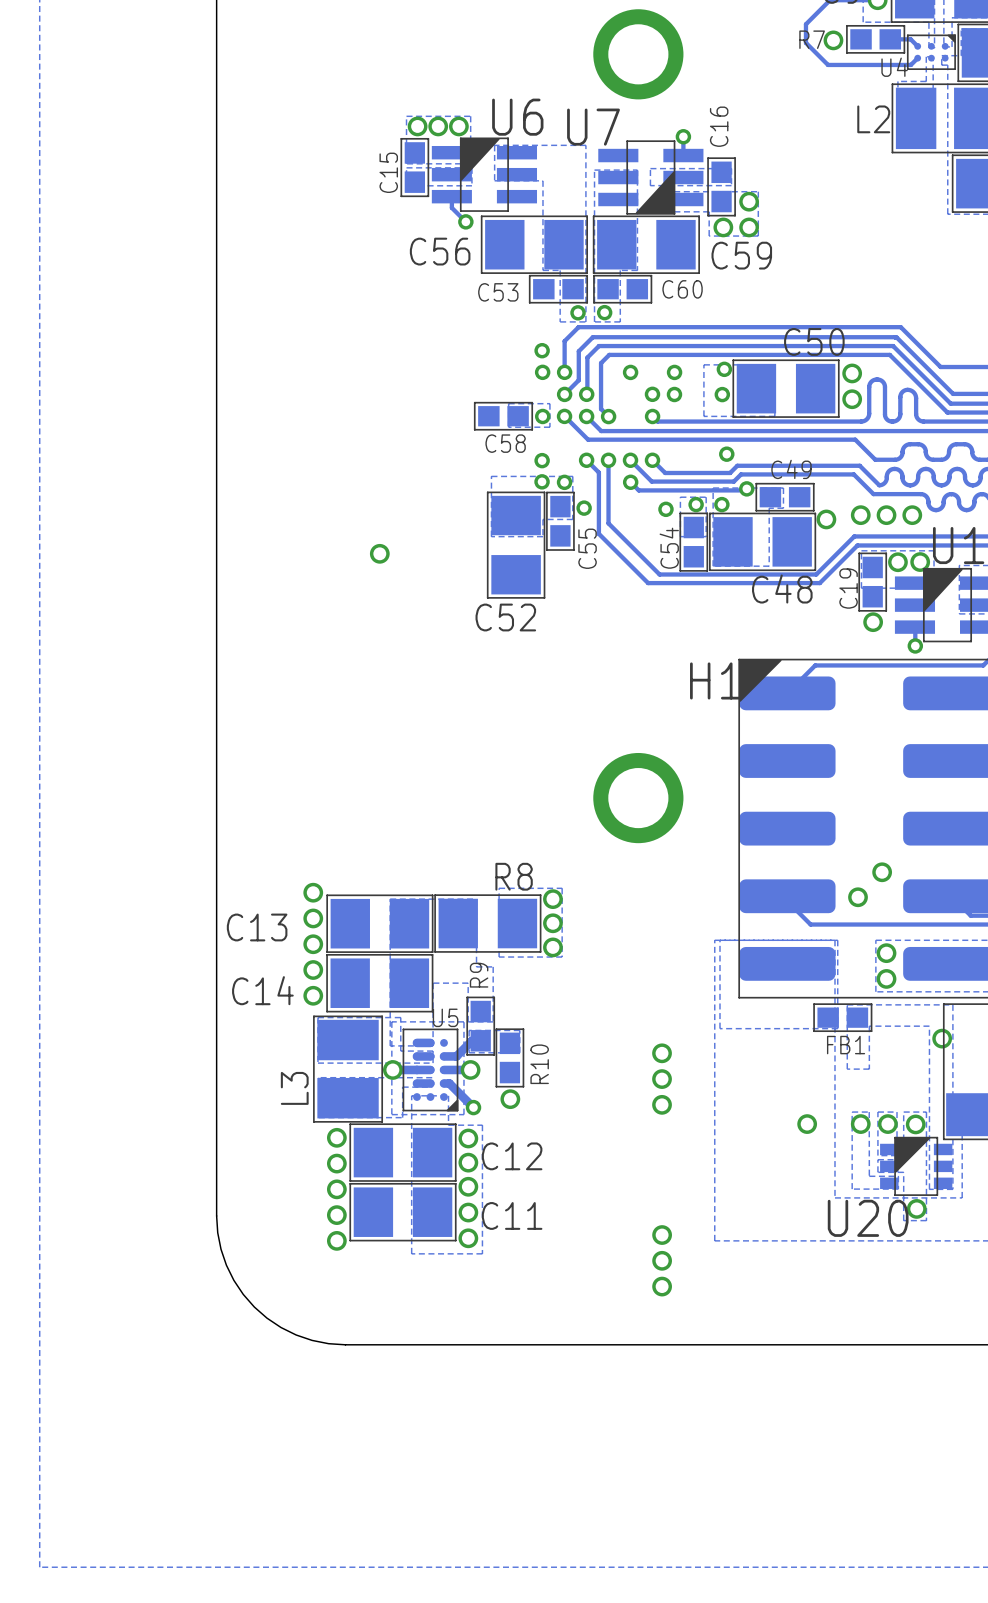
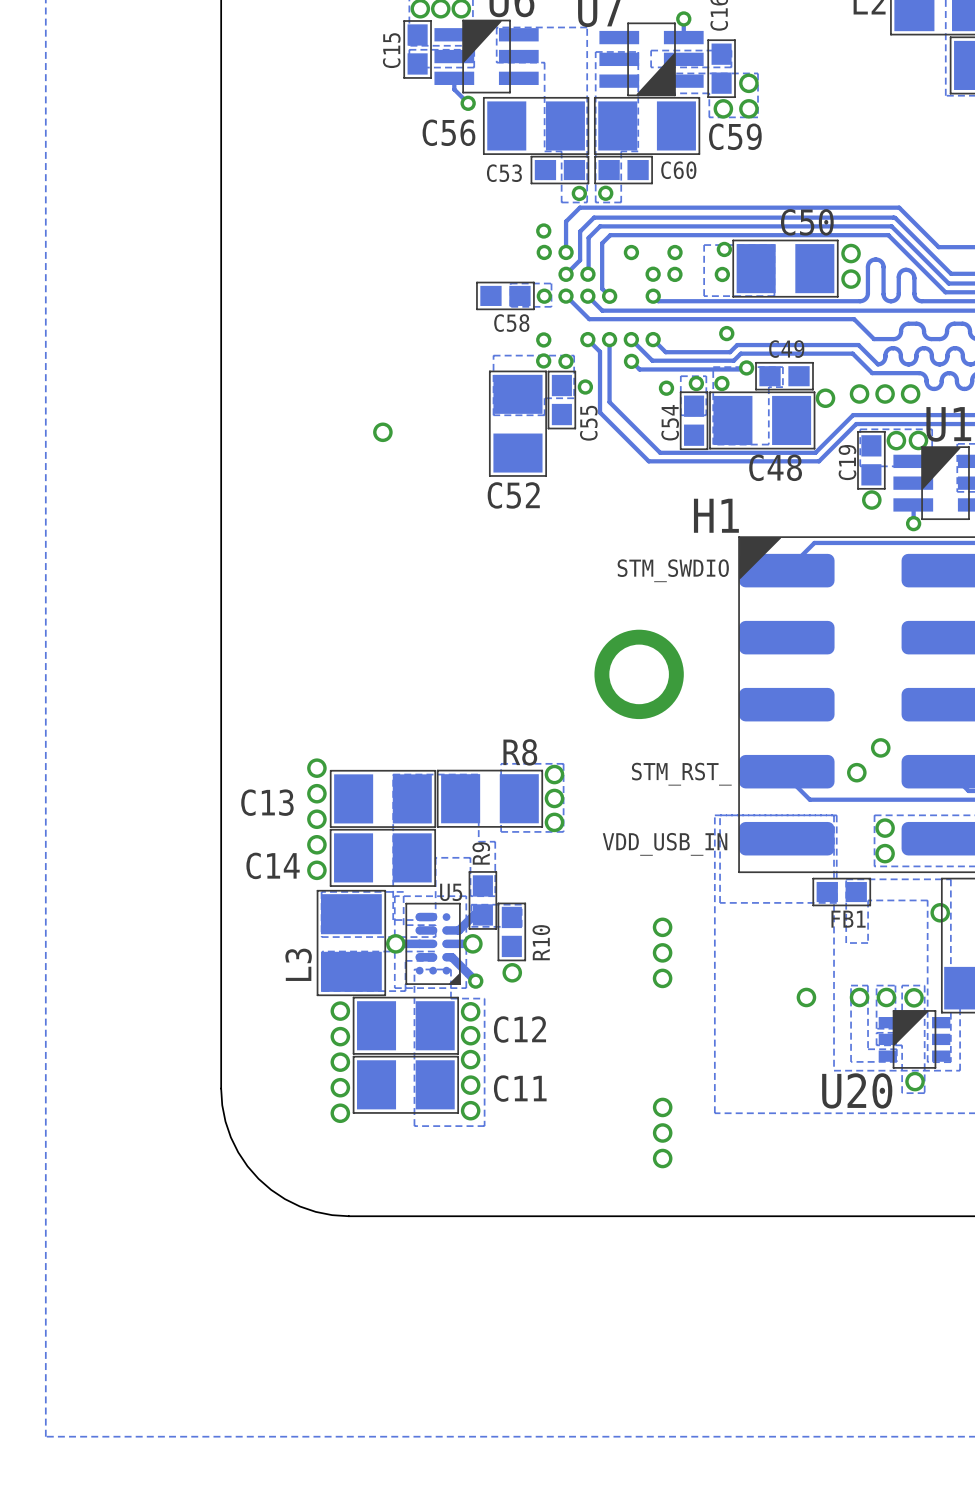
H1 name position: H1 (715, 680) -> H1 (716, 515)
text: none -> STM_SWDIO (673, 570)
text: none -> STM_RST_ (681, 774)
text: none -> VDD_USB_IN (665, 844)

